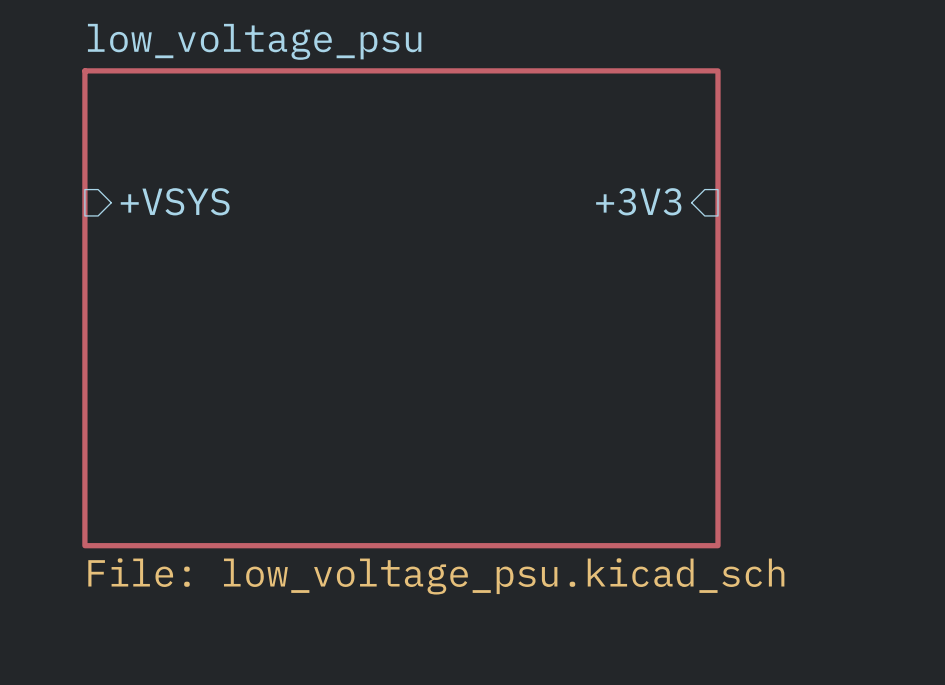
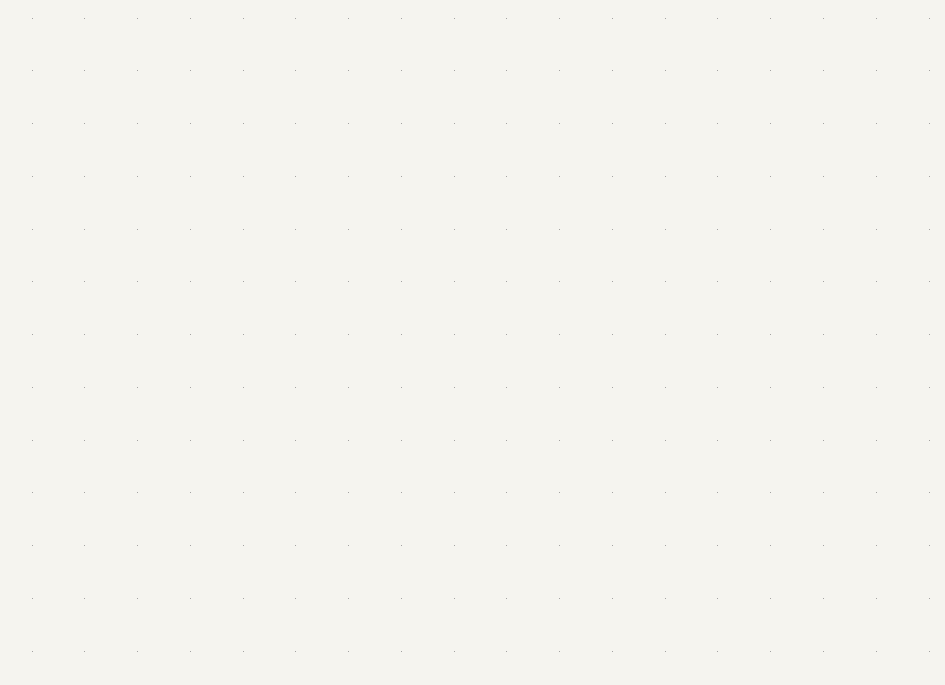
sheet pin: +VSYS (175, 201) -> none
sheet pin: +3V3 (638, 201) -> none
sheet low_voltage_psu: File: low_voltage_psu.kicad_sch (401, 308) -> none

